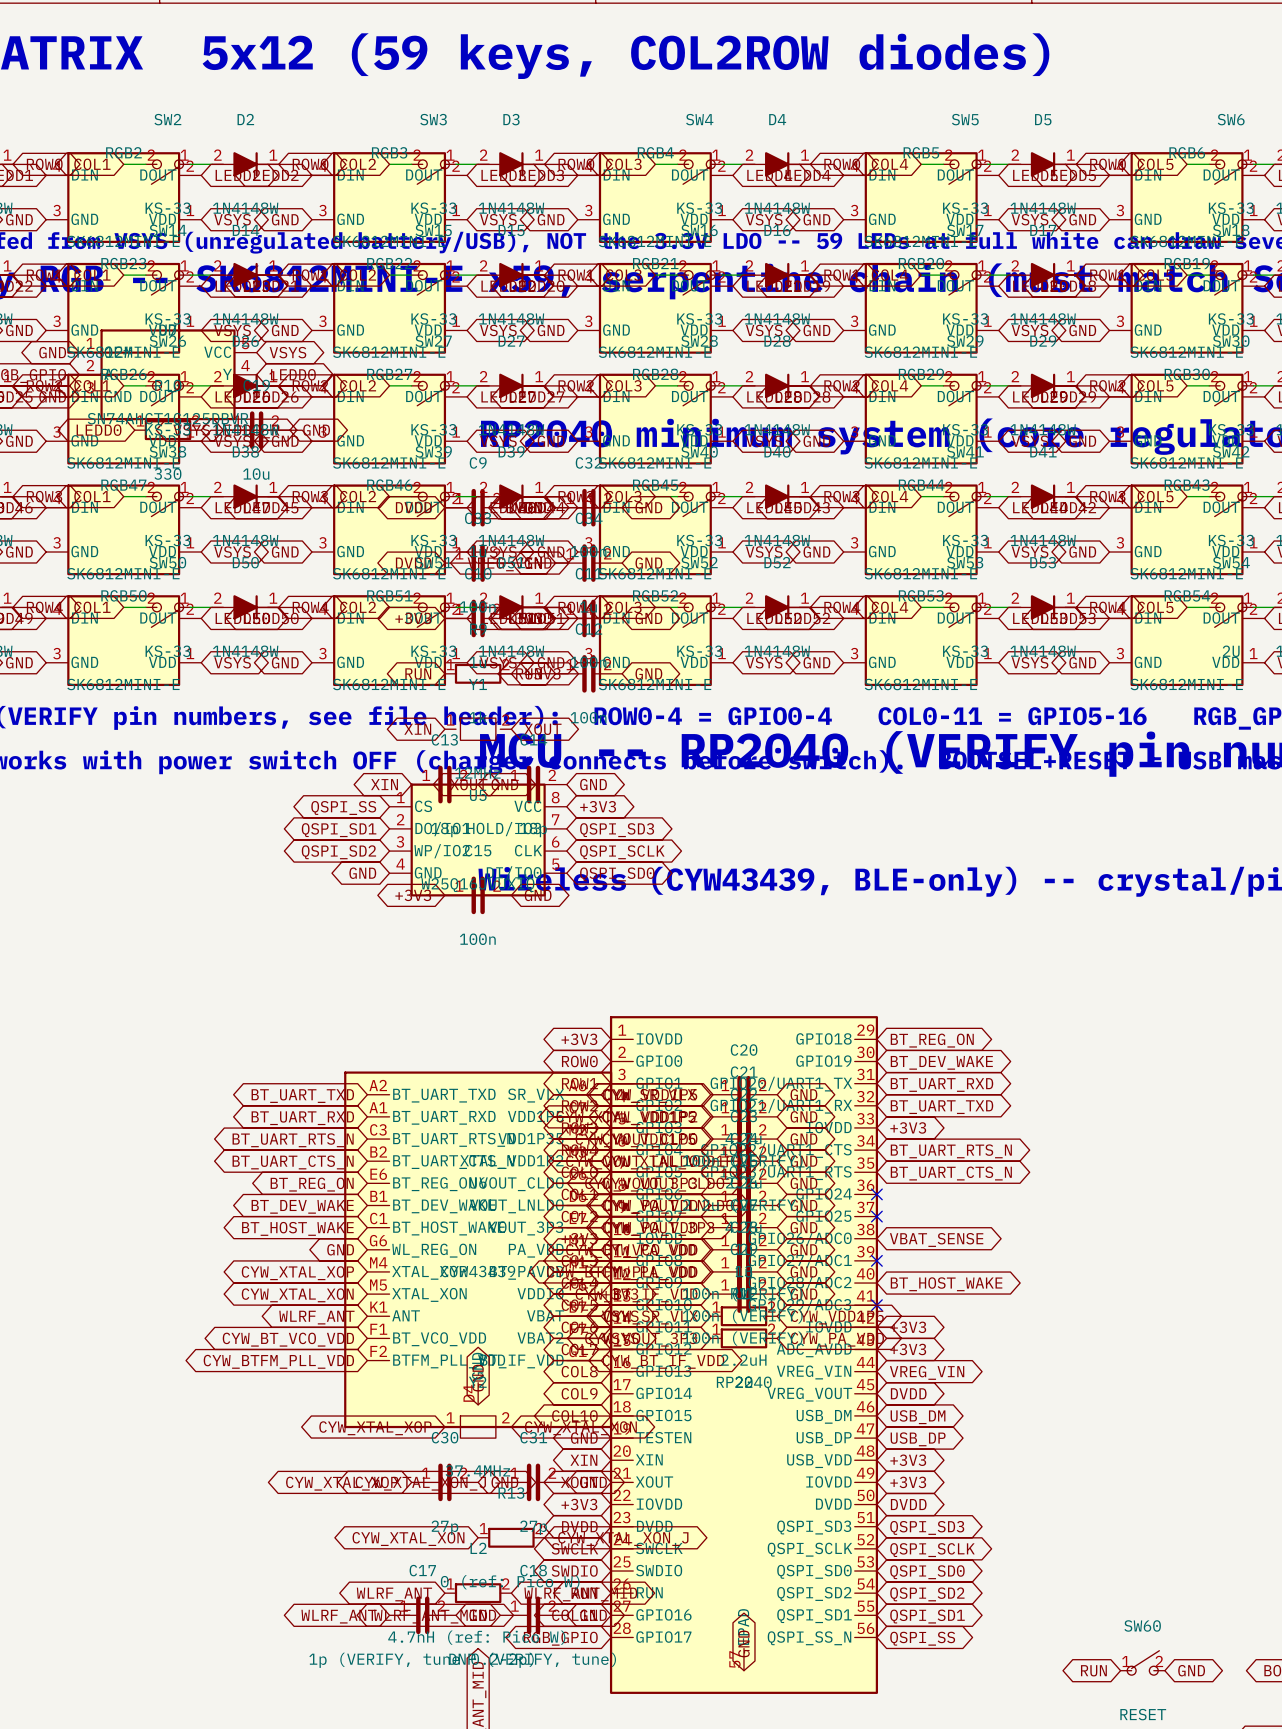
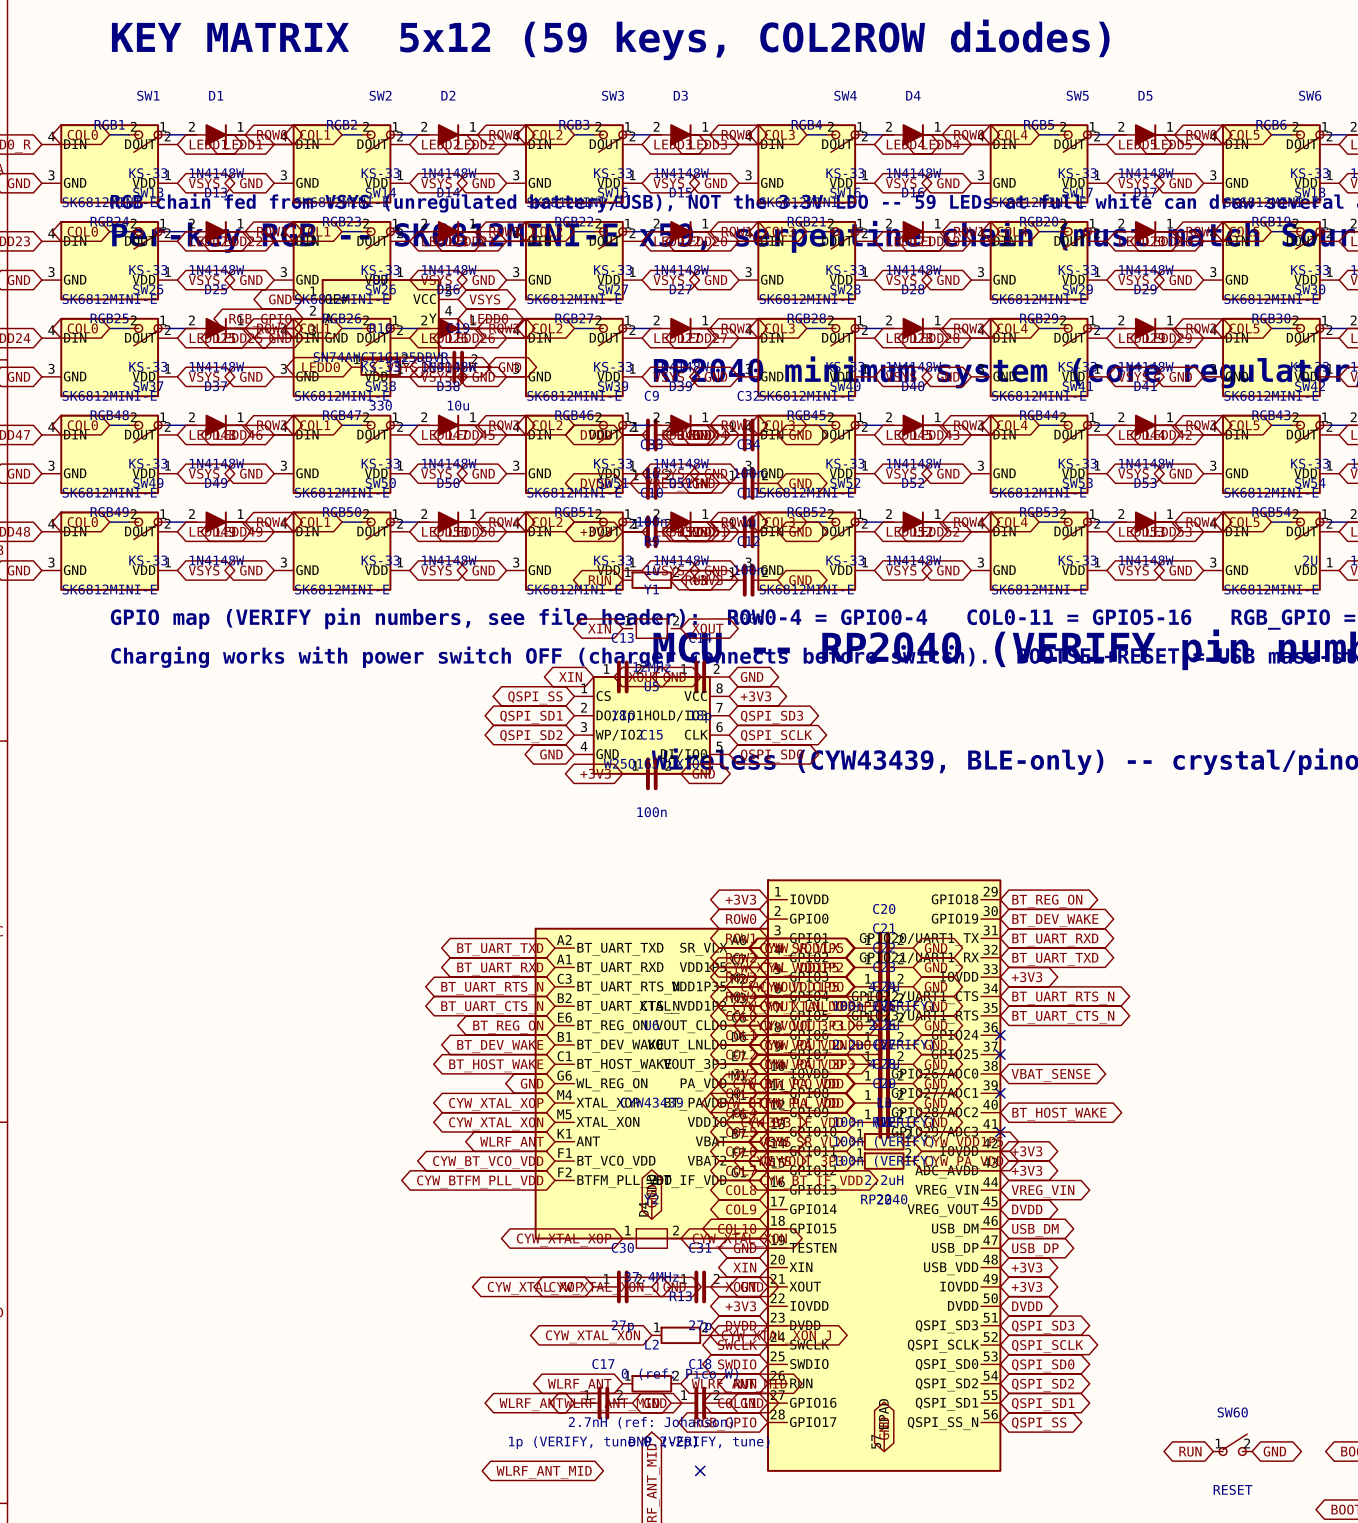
L2 value: 4.7nH (ref: Pico W) (476, 1637) -> 2.7nH (ref: Johanson) (650, 1422)
no-connect mark: none -> (700, 1470)
global label: none -> WLRF_ANT_MID (544, 1472)

